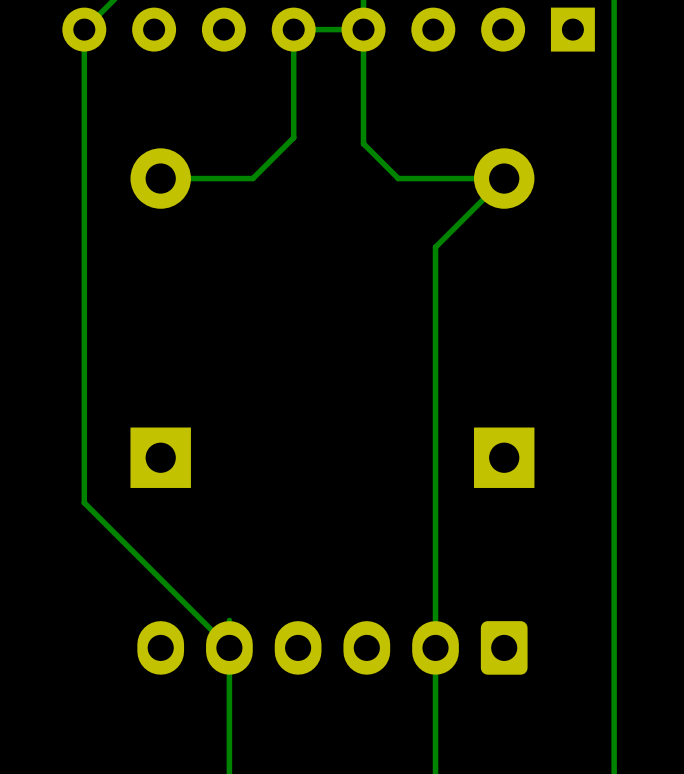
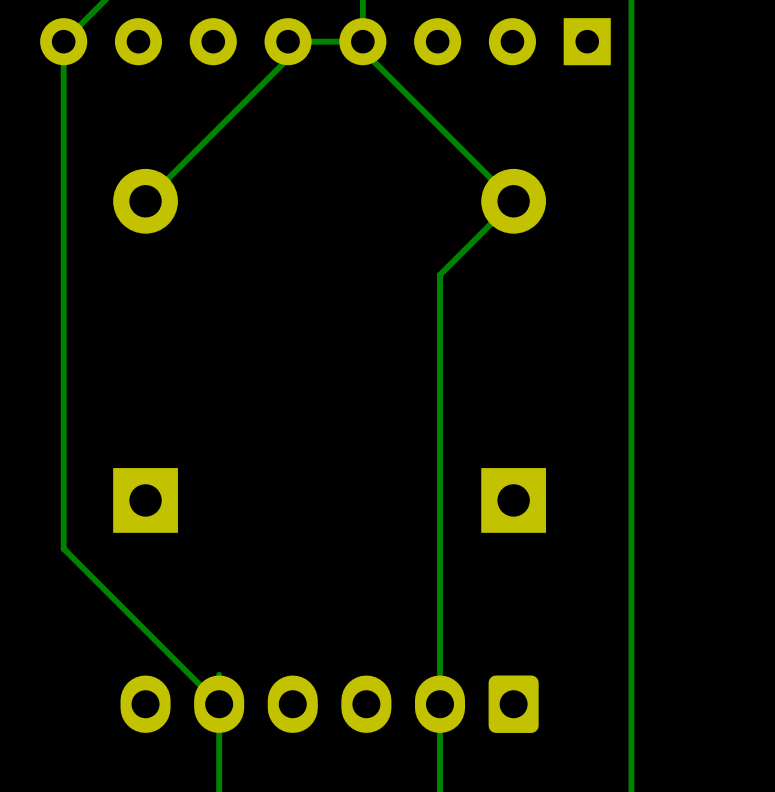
track: (363, 37) (363, 143) (398, 178) (504, 178) -> (362, 50) (513, 201)
track: (293, 45) (293, 137) (252, 178) (160, 178) -> (288, 58) (145, 201)

